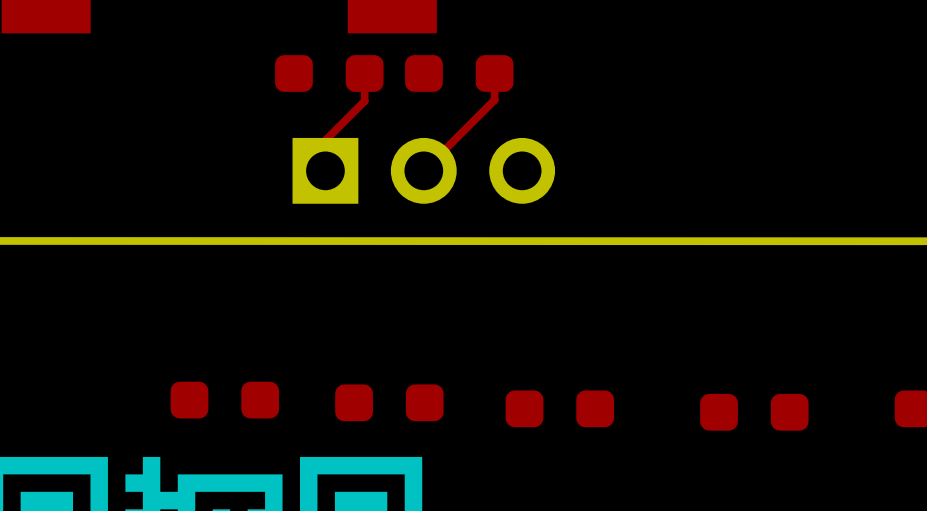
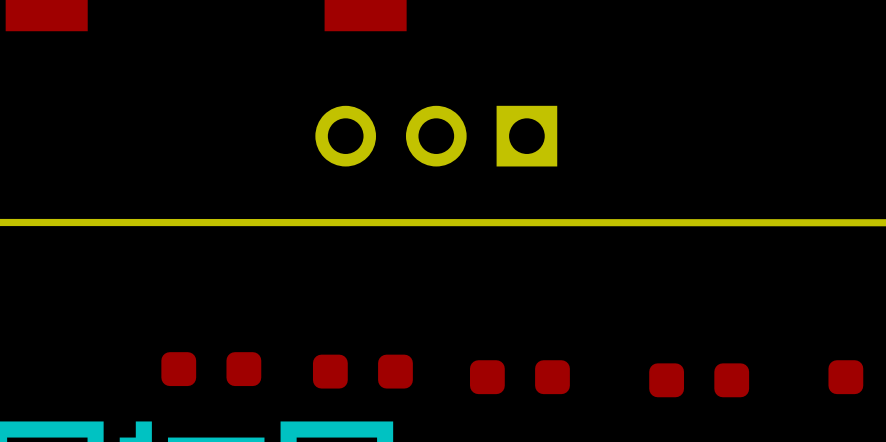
part: (329, 73) -> none
top track: (364, 73) (364, 101) (325, 140) -> none
part: (459, 73) -> none
top track: (494, 73) (494, 100) (423, 170) -> none
part rotation: 0° (423, 170) -> 180° (436, 136)

